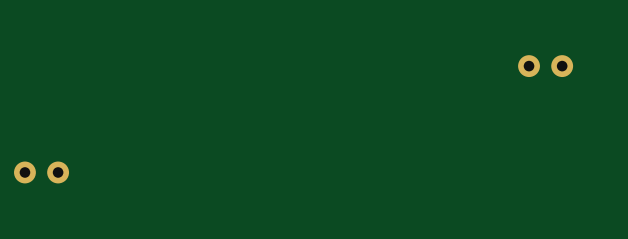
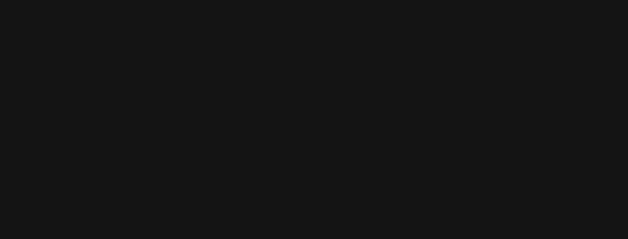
part: (545, 66) -> none
part: (41, 172) -> none

